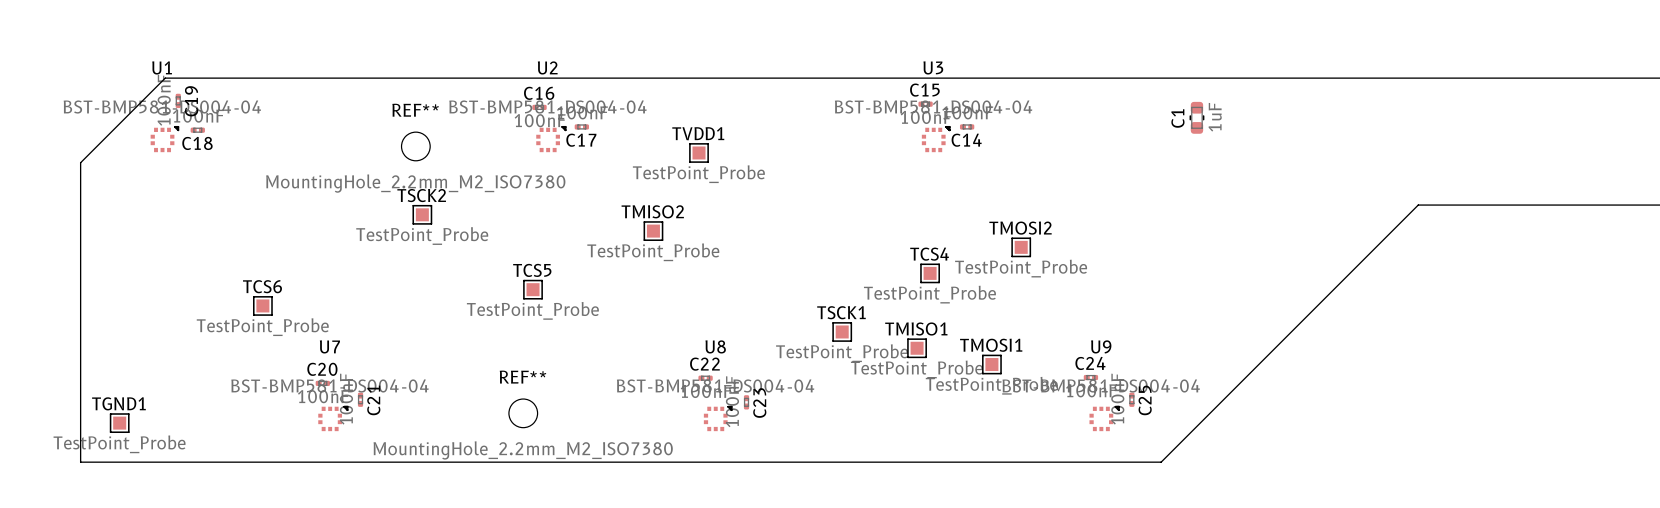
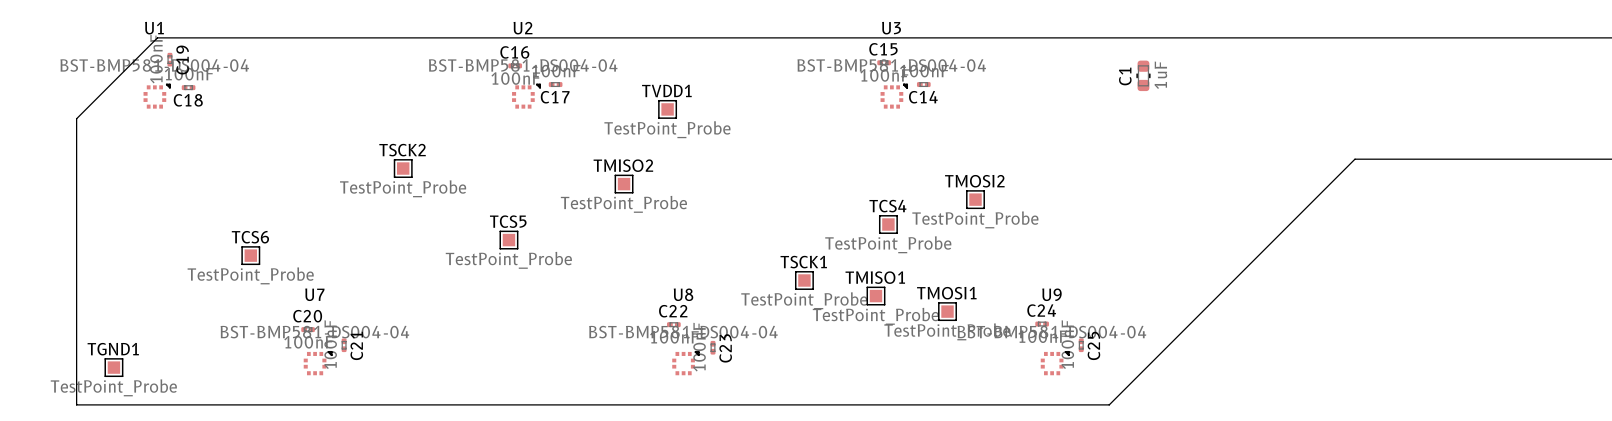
REF**: MountingHole_2.2mm_M2_ISO7380 (415, 146) -> none
REF**: MountingHole_2.2mm_M2_ISO7380 (523, 413) -> none

